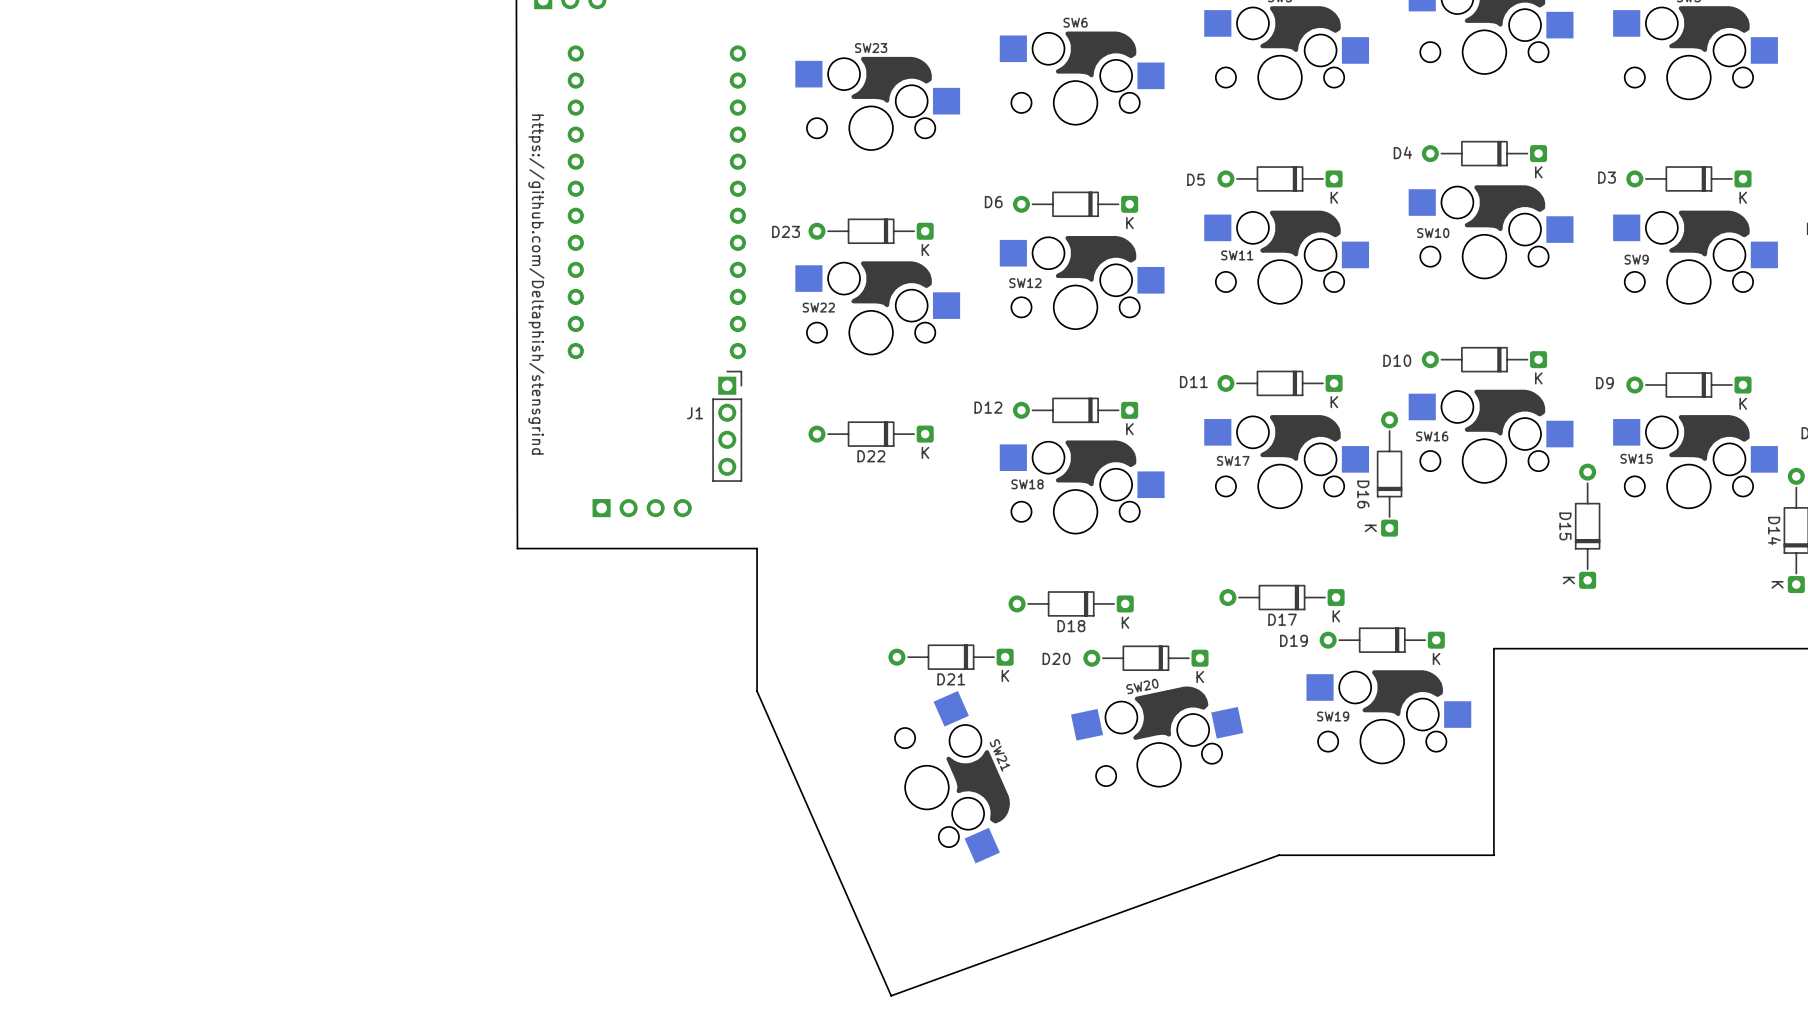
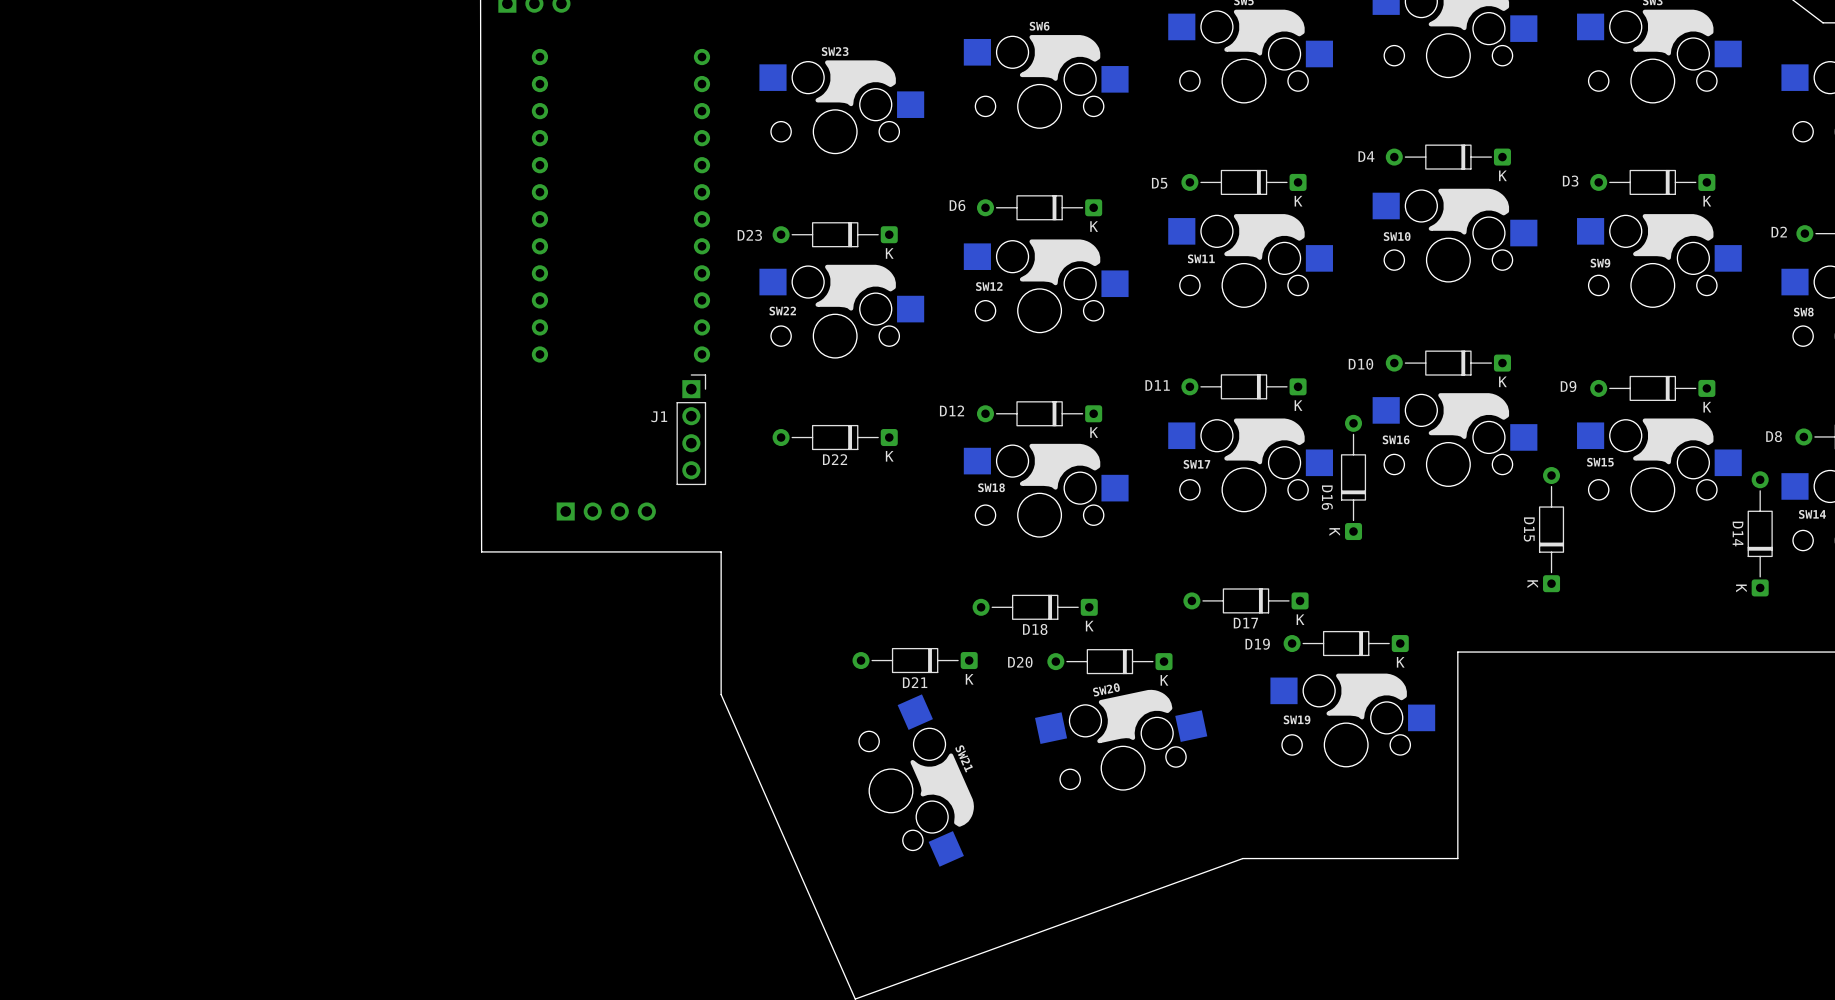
text: https://github.com/Deltaphish/stensgrind (536, 284) -> none

